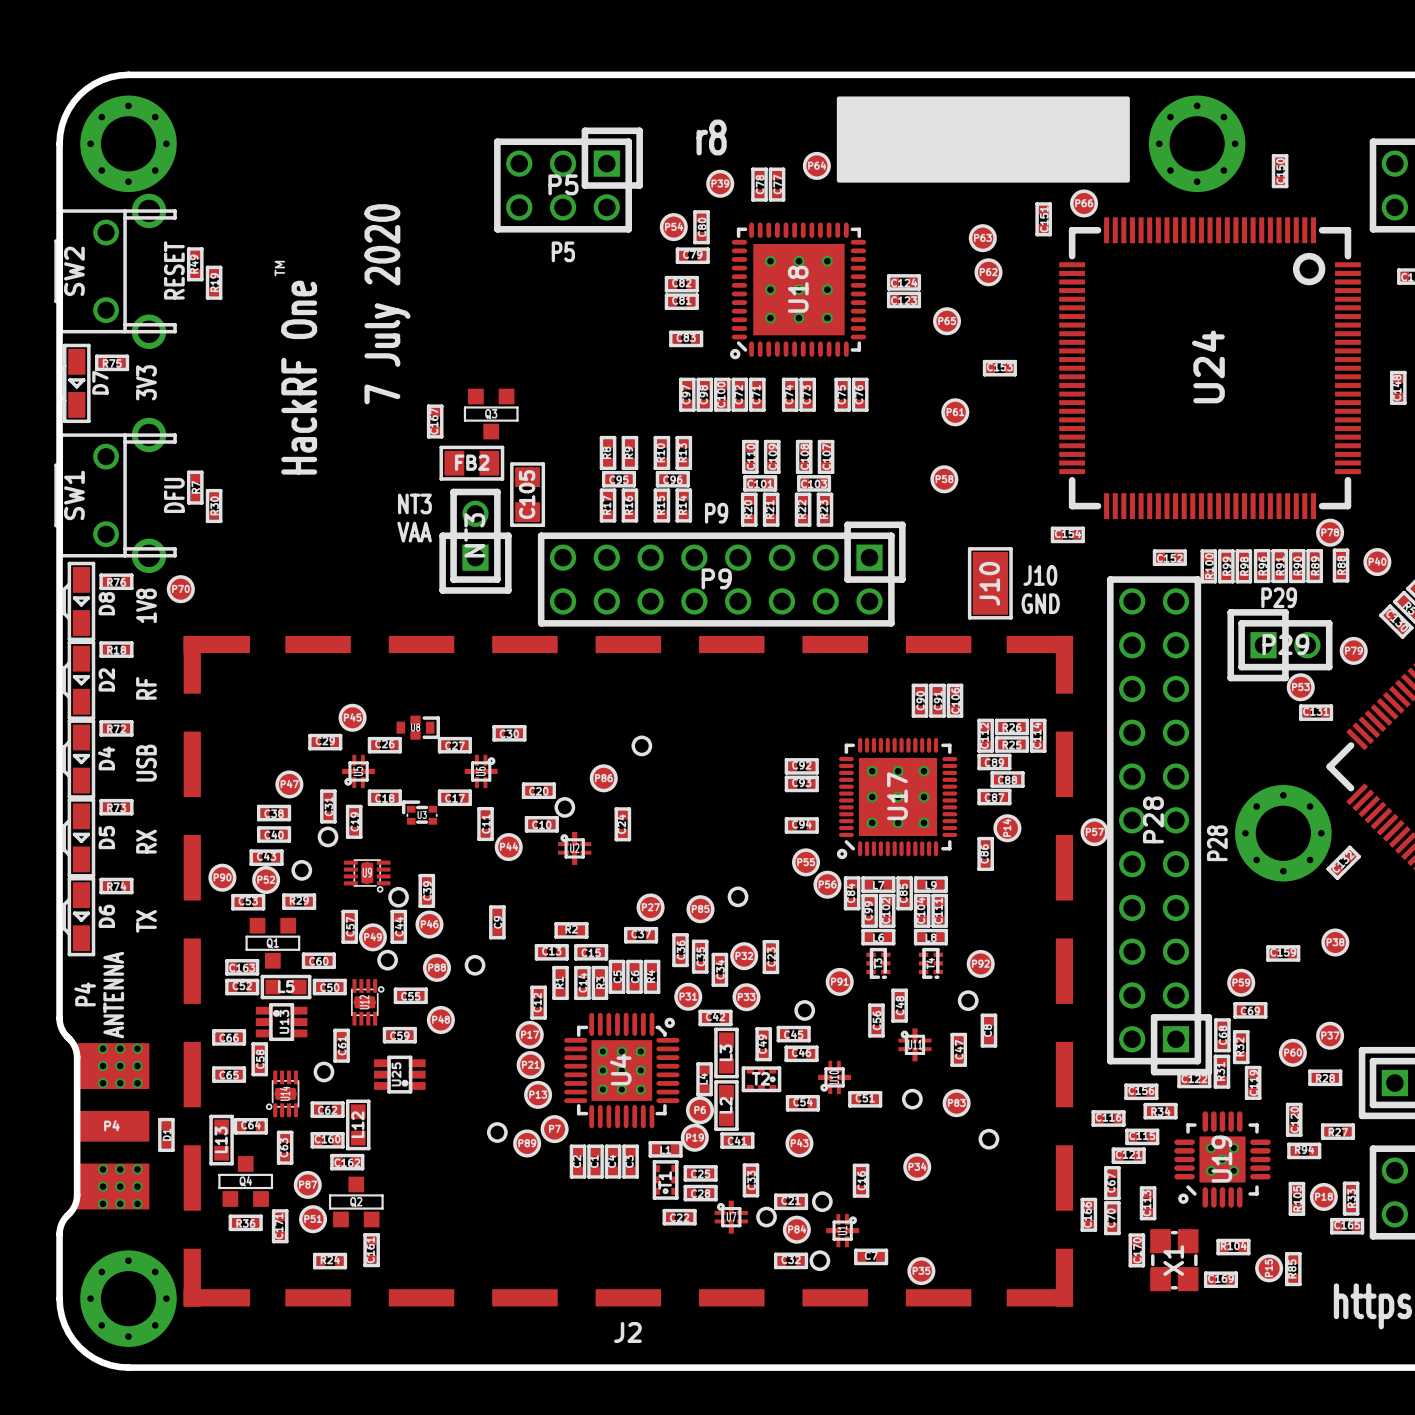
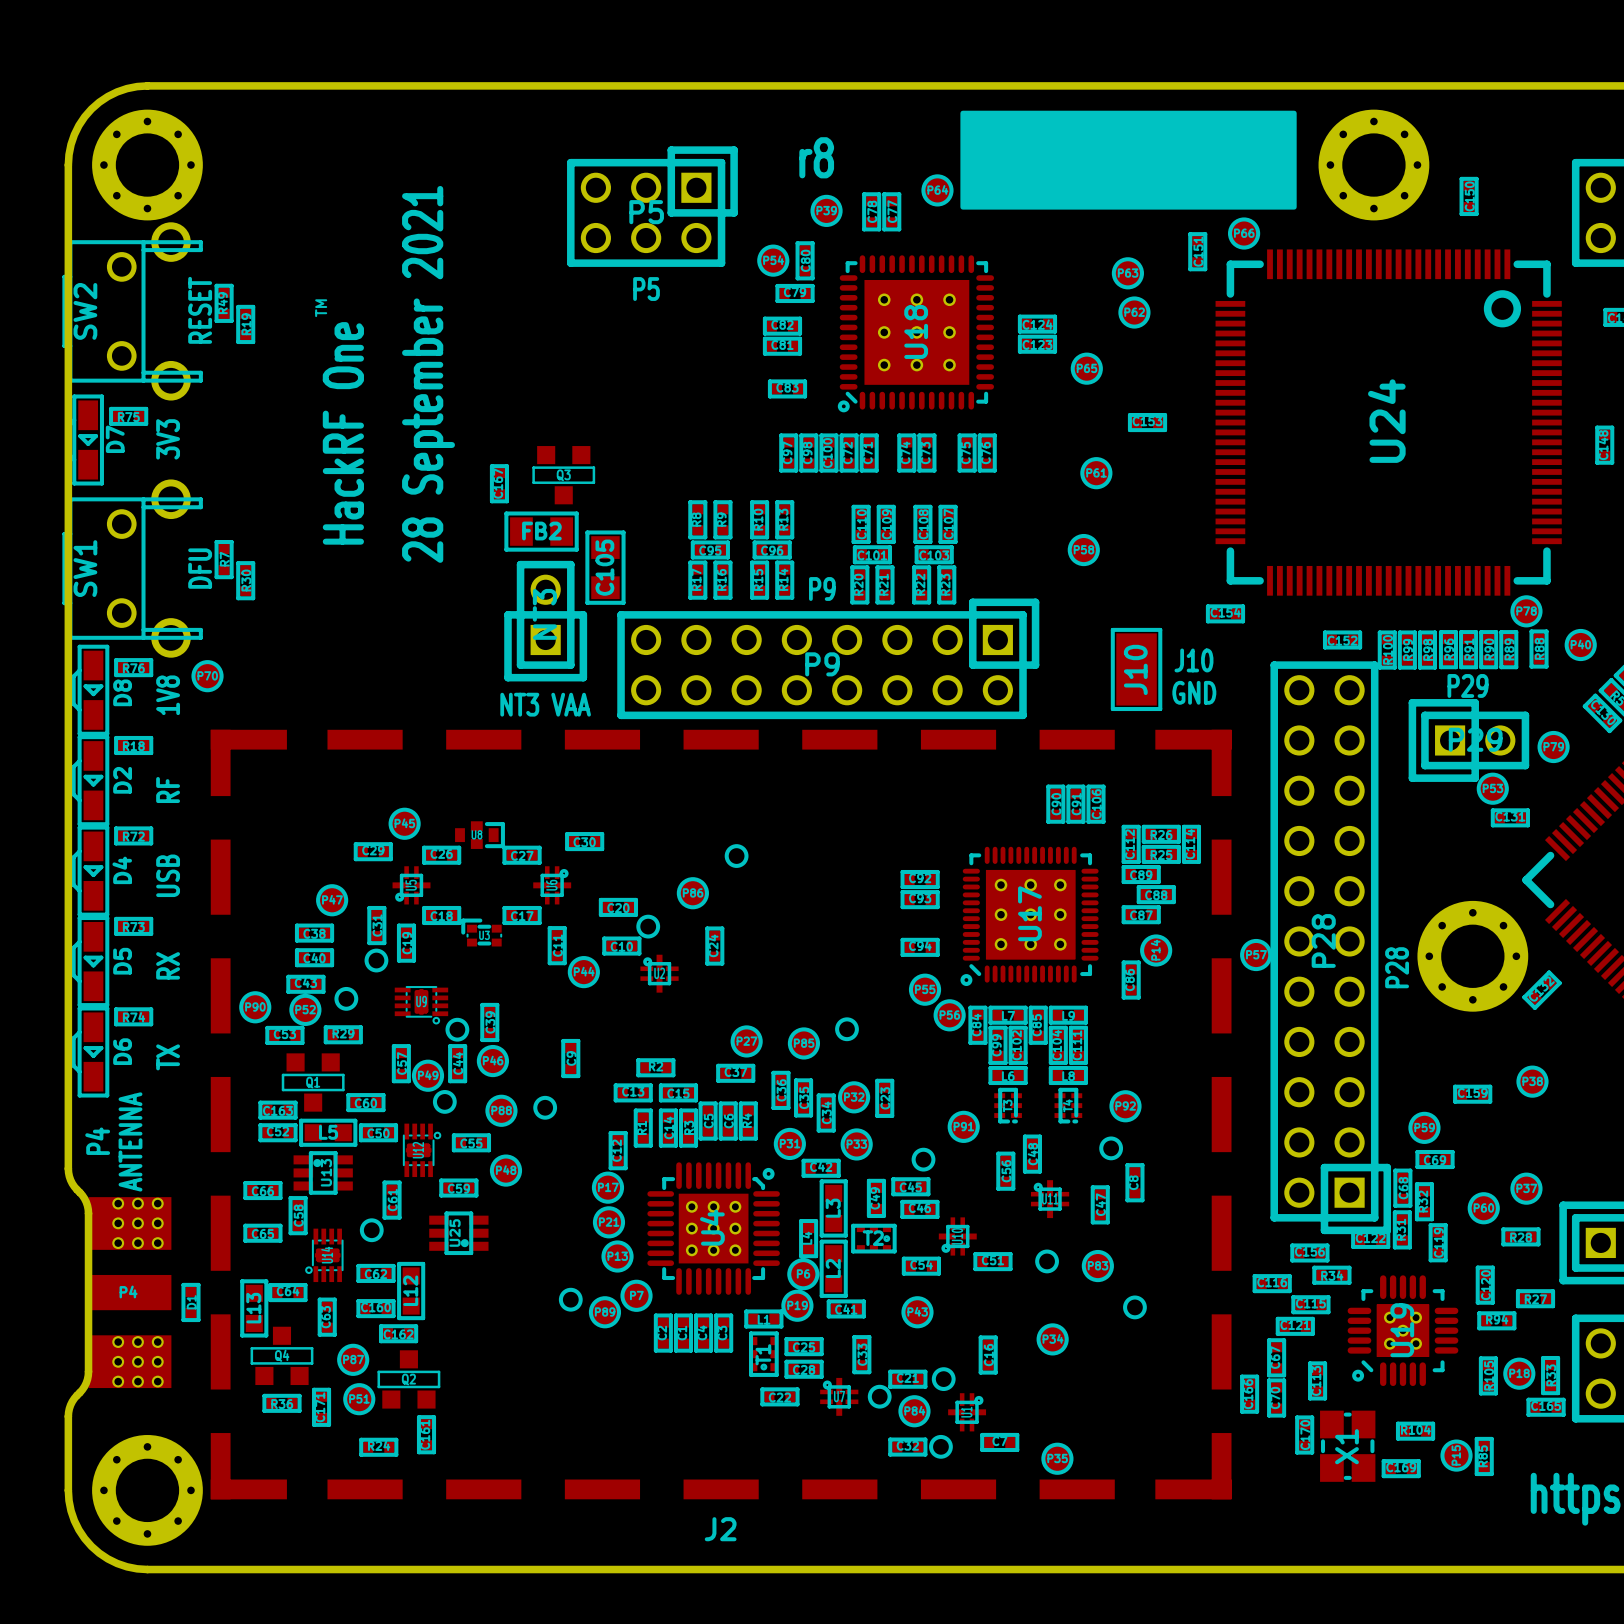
text: 7 July 2020 (387, 304) -> none
text: none -> 28 September 2021 (428, 374)
text: NT3 (414, 503) -> none
text: VAA (414, 532) -> none
text: none -> NT3 VAA (545, 704)

